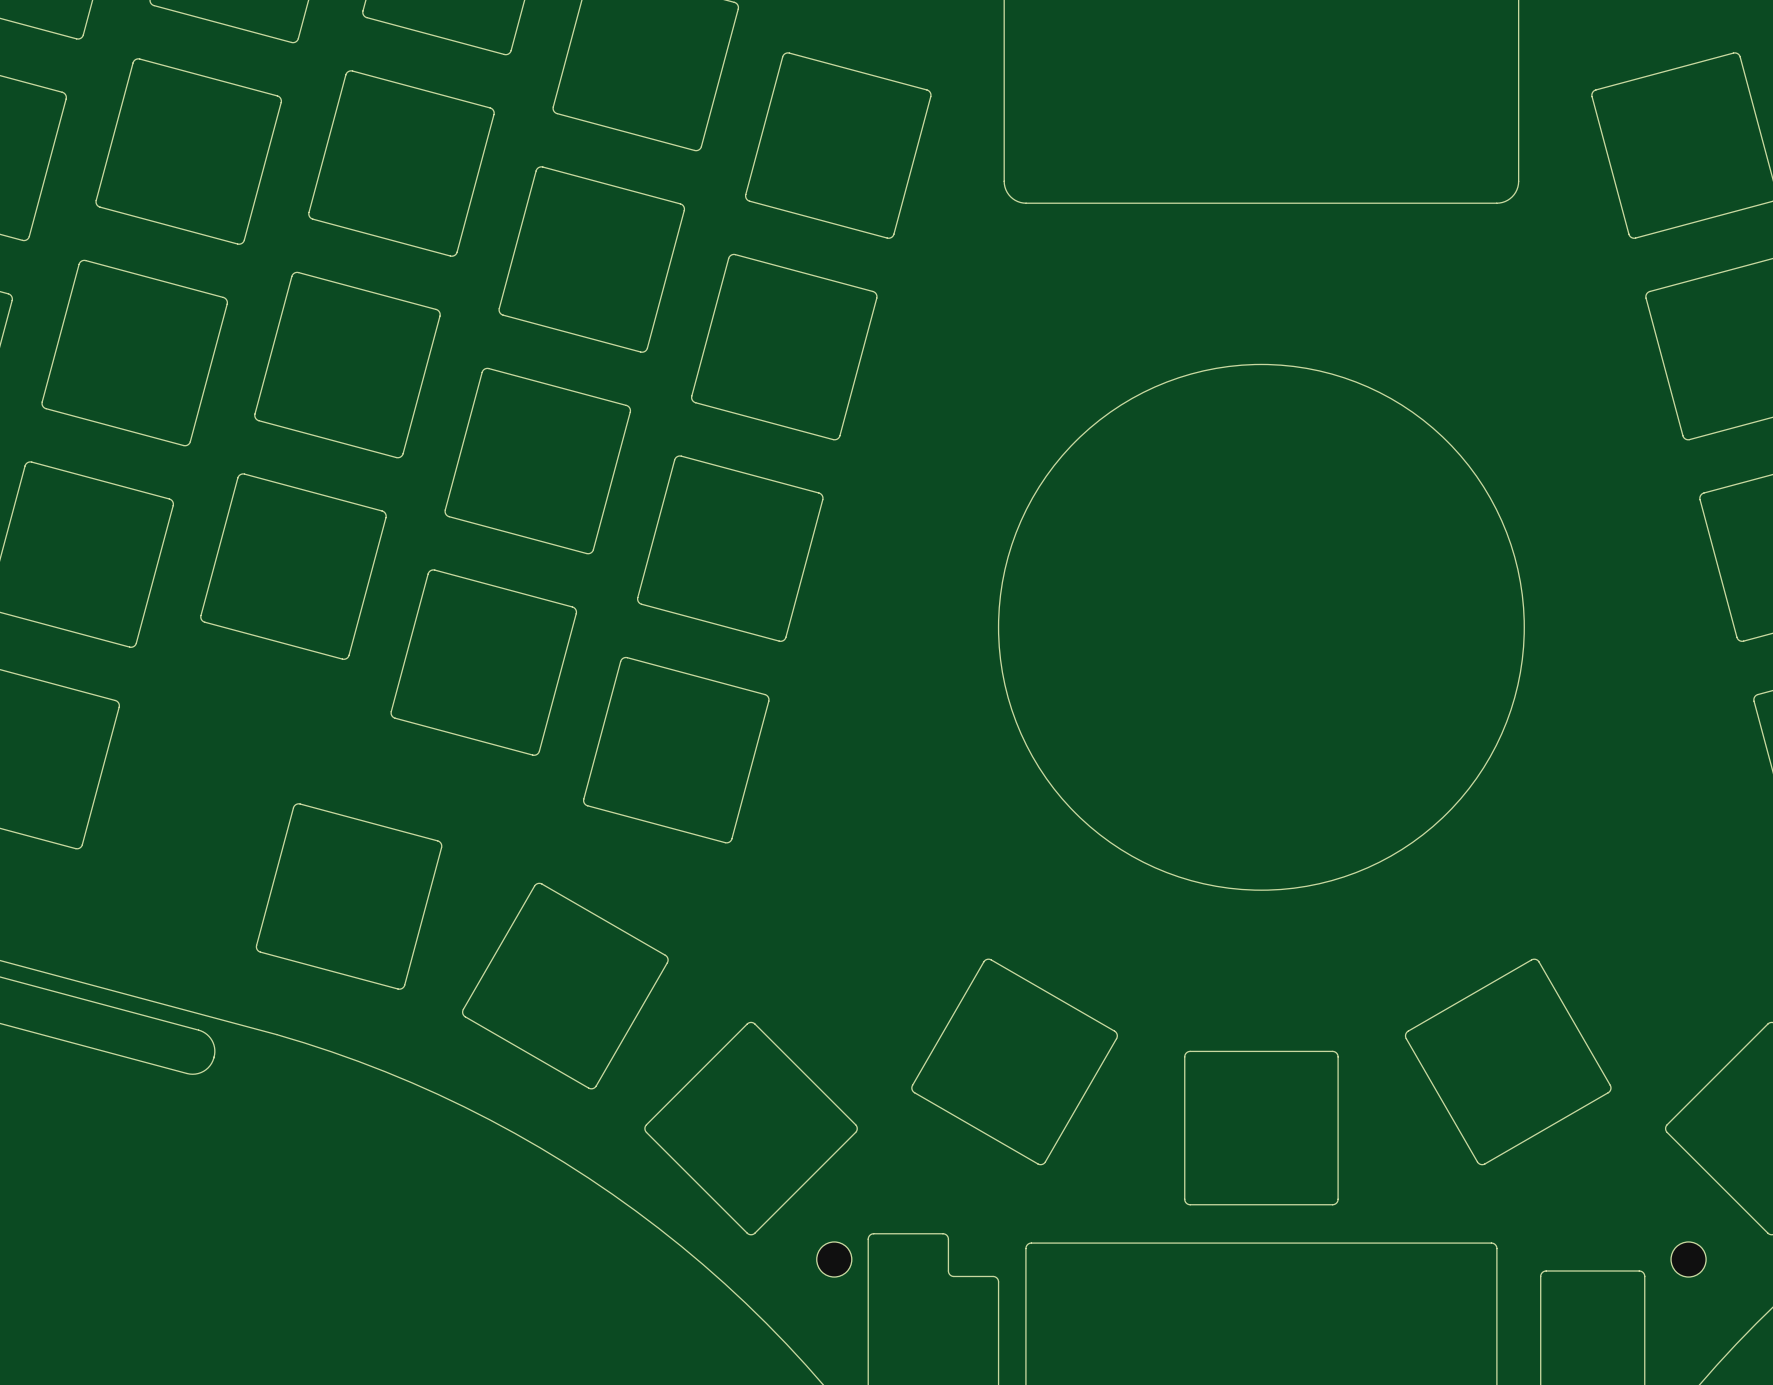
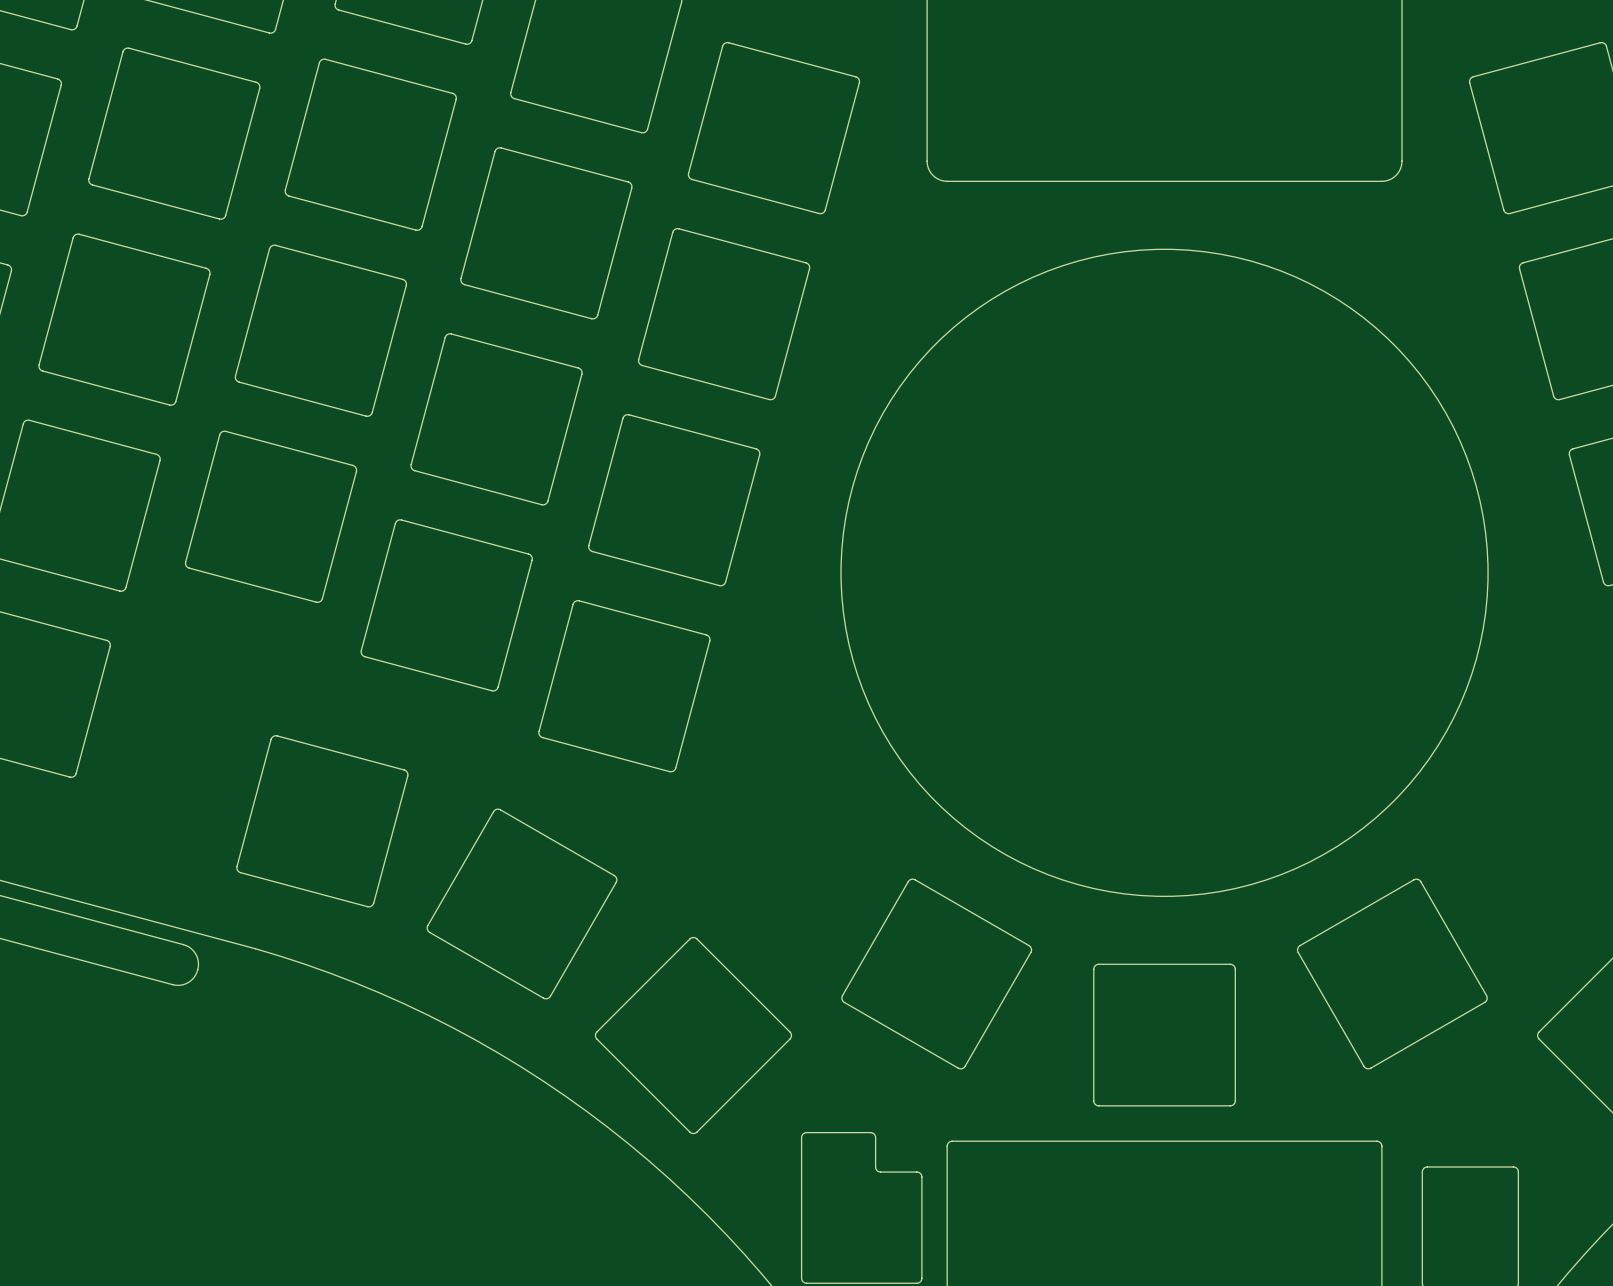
round board edge size: [998, 363, 1525, 891] -> [840, 248, 1489, 897]
part: (834, 1259) -> none
part: (1688, 1259) -> none

